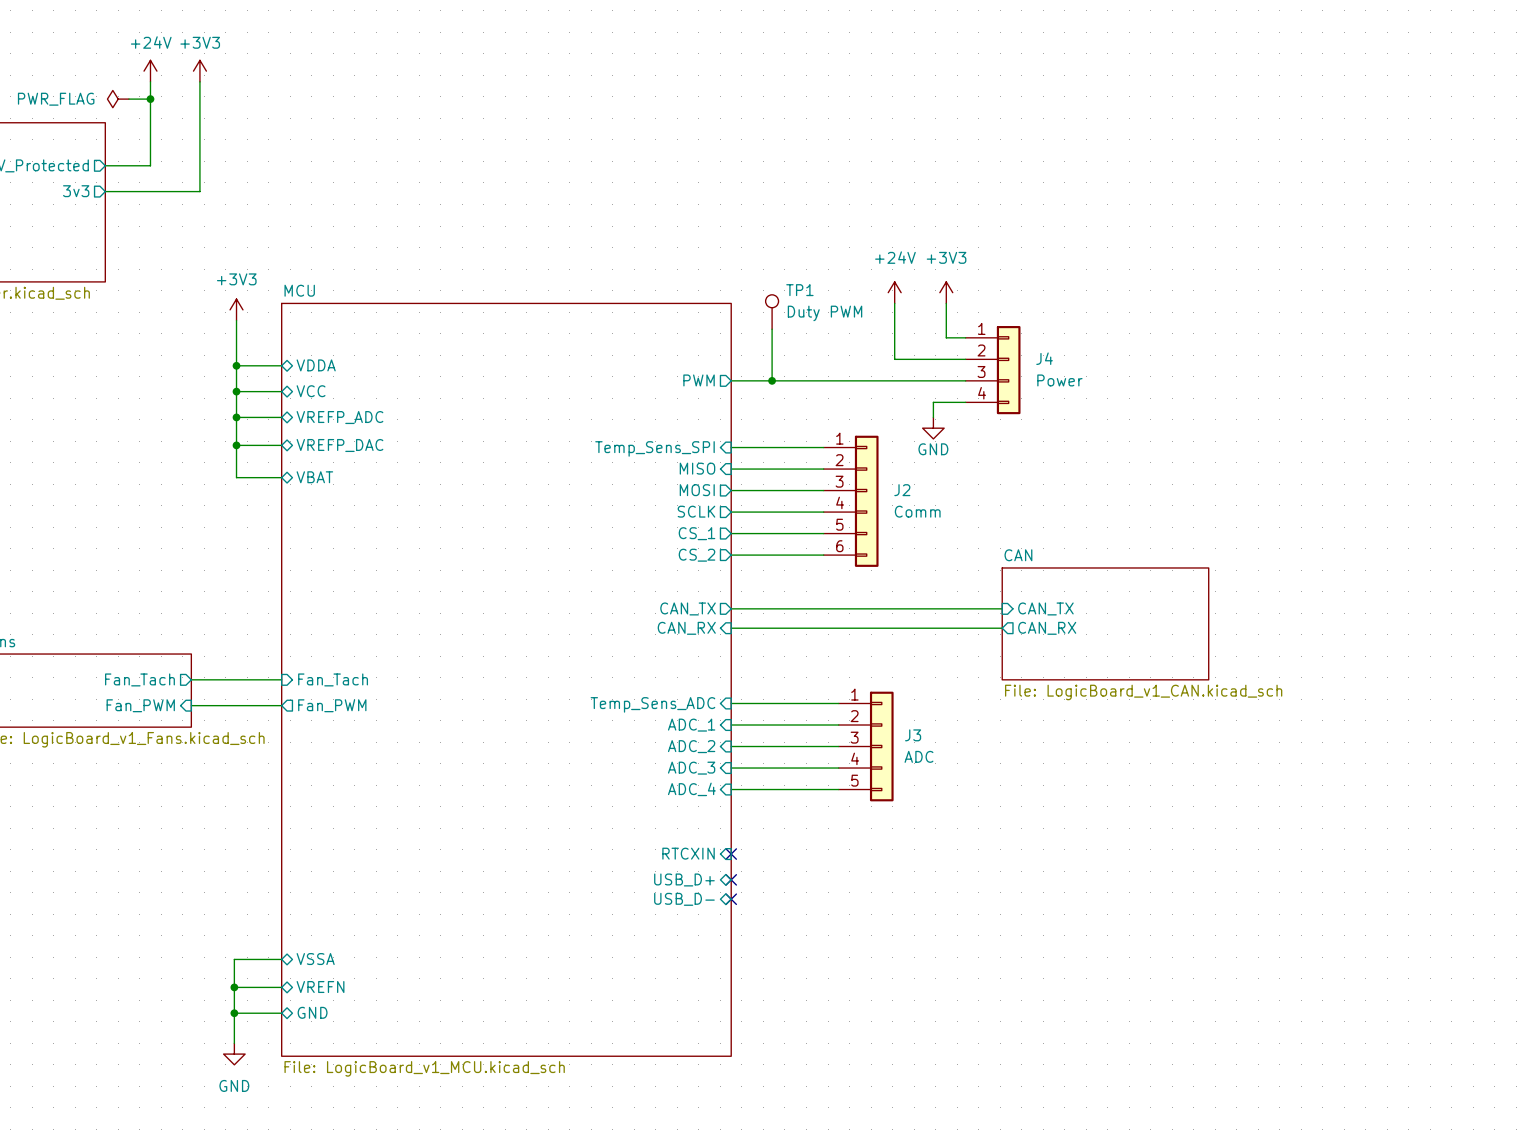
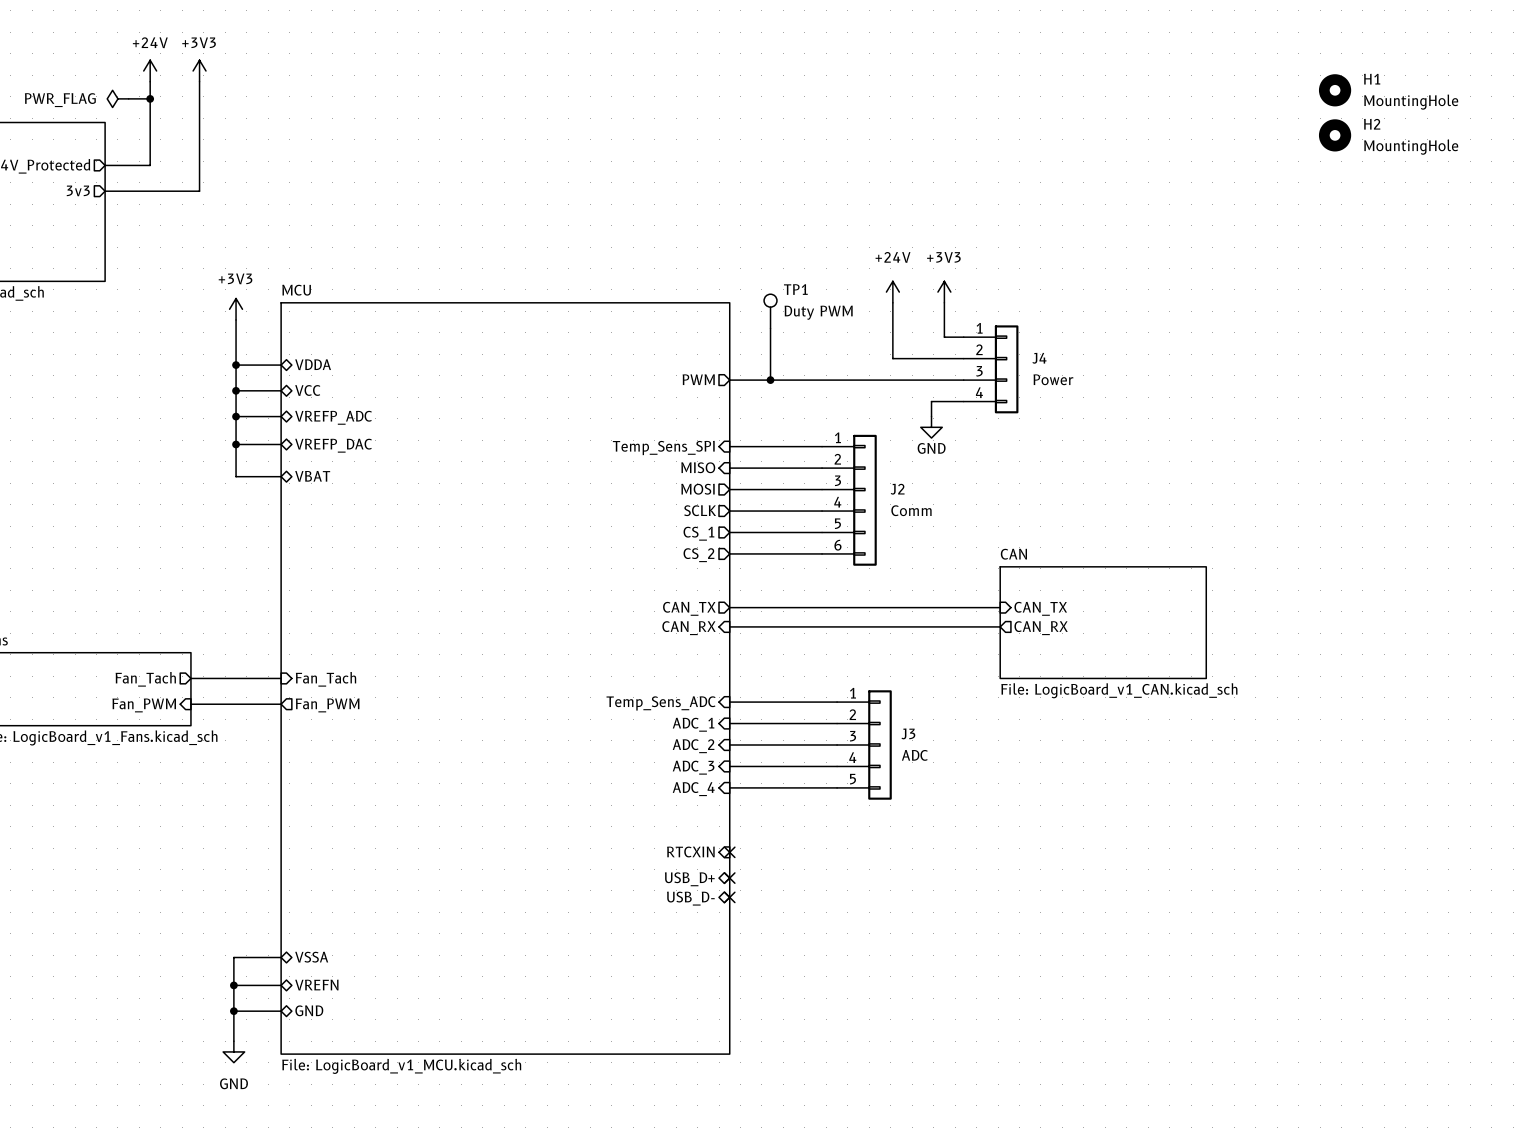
H1: none -> MountingHole (1335, 90)
H2: none -> MountingHole (1335, 135)

